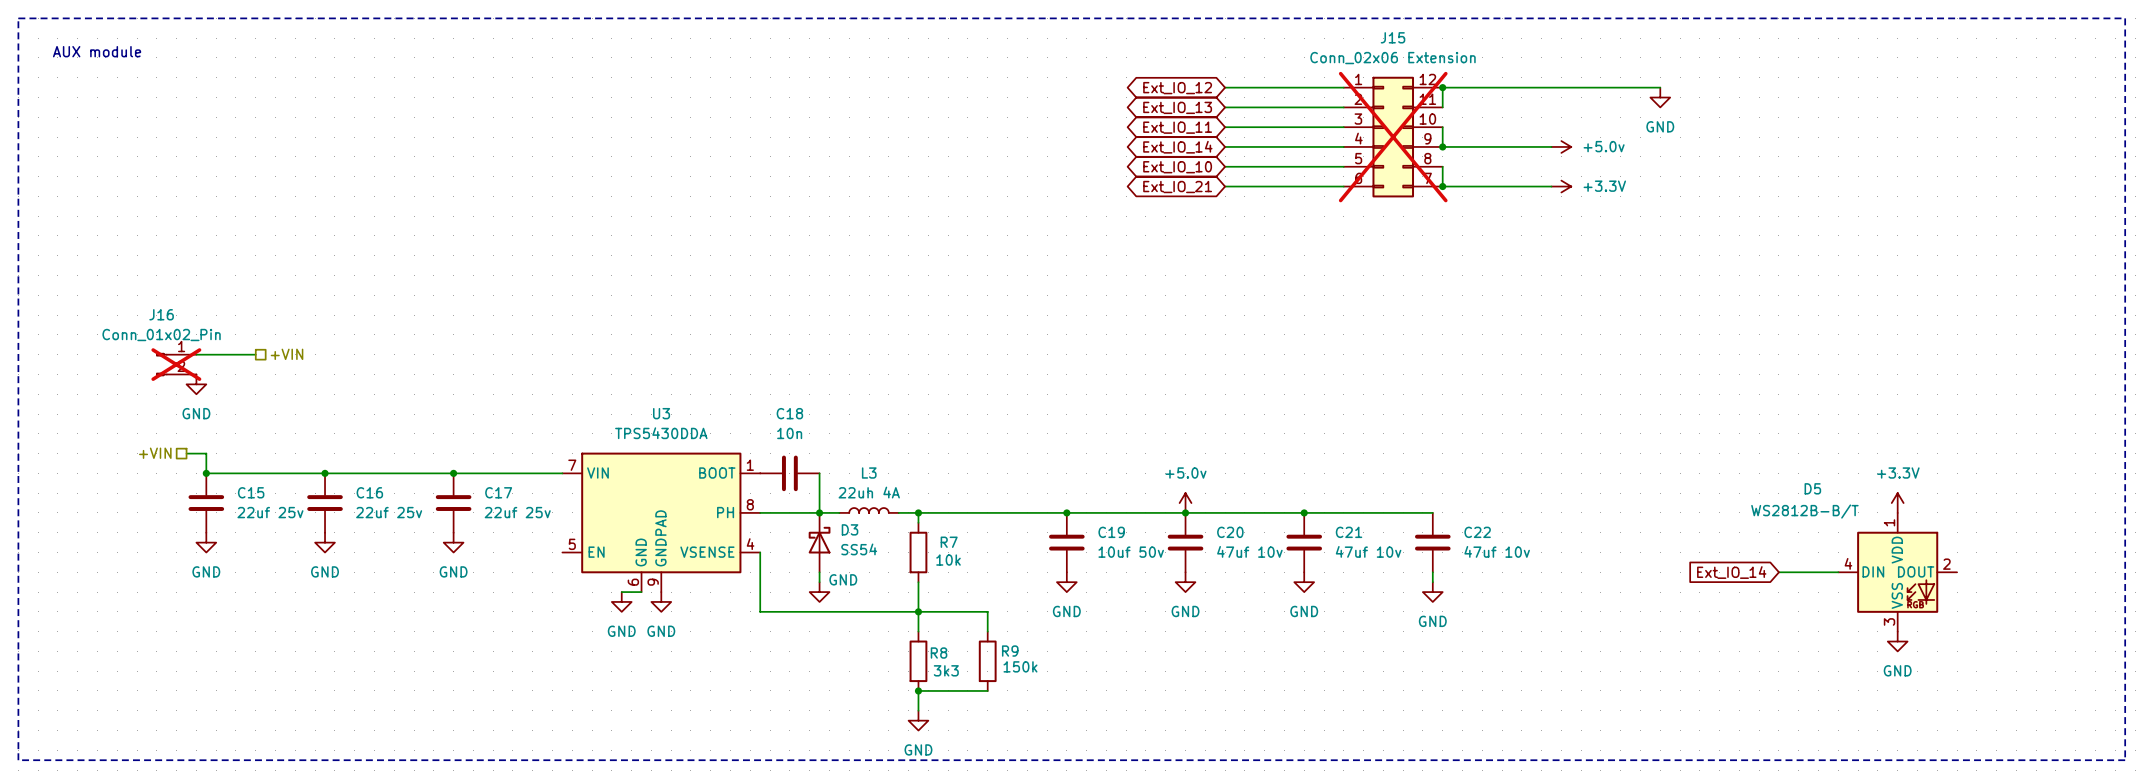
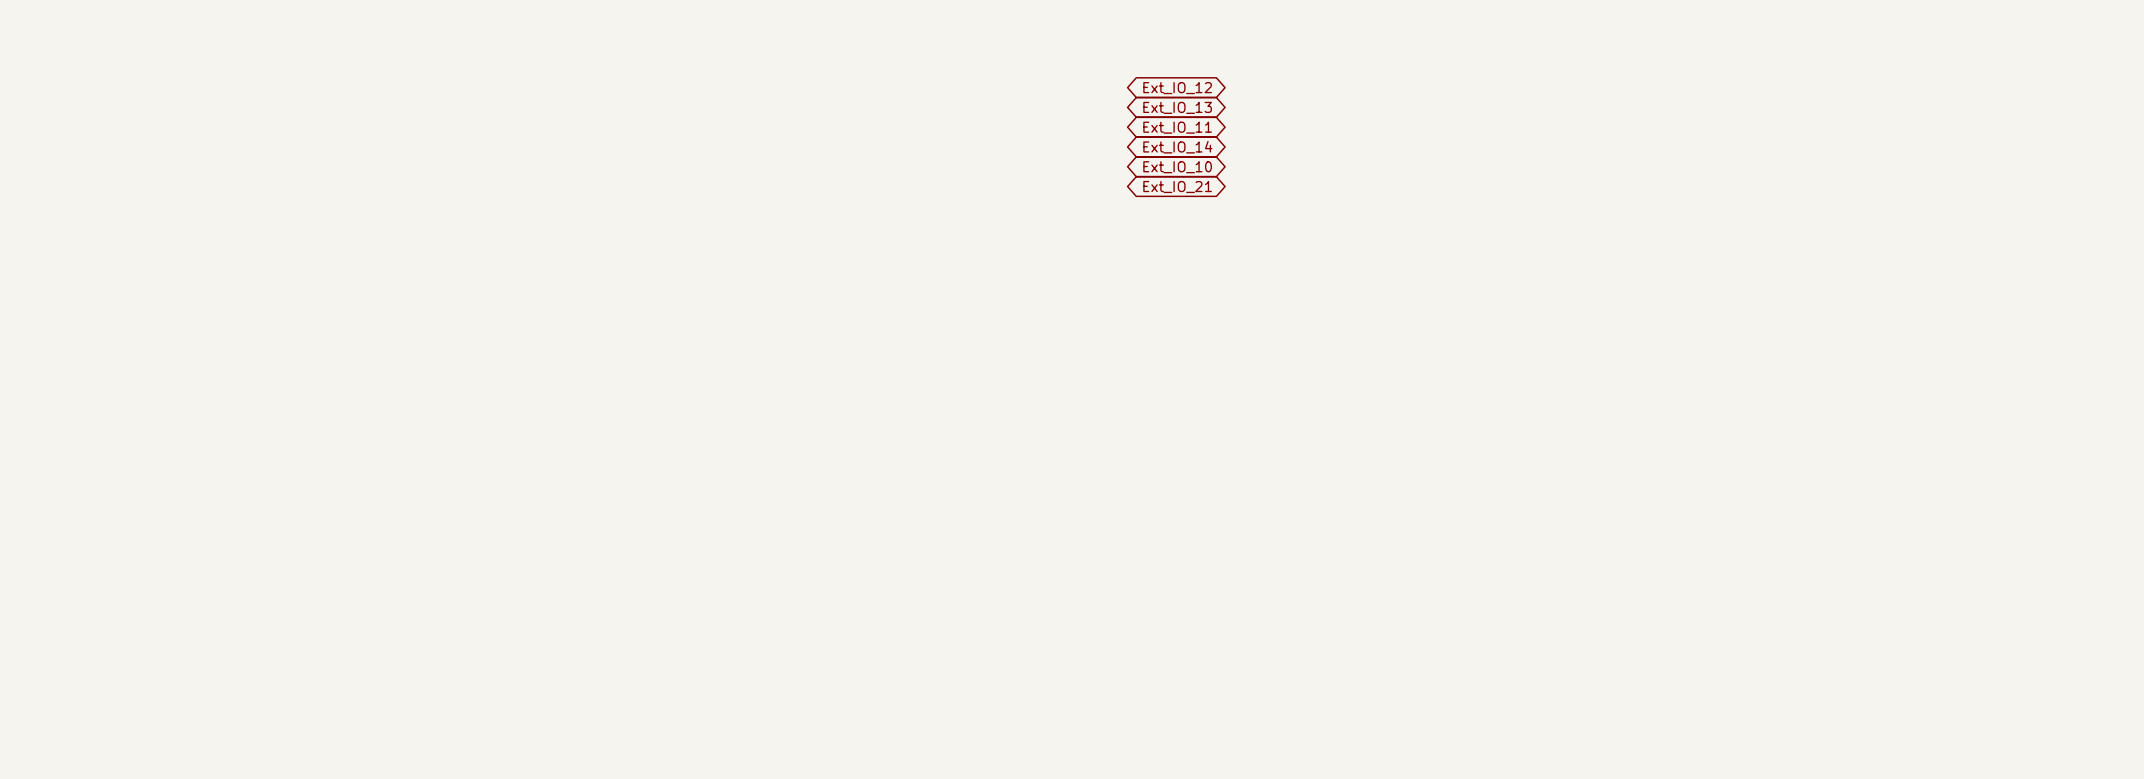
line: (18, 18) (2125, 18) (2125, 760) (18, 760) (18, 18) -> none
text: AUX module (97, 51) -> none
wire: (1225, 87) (1343, 87) -> none
junction: (1442, 87) -> none
wire: (1660, 87) (1442, 87) (1442, 107) -> none
power symbol: GND (1660, 97) -> none
wire: (1225, 107) (1343, 107) -> none
wire: (1225, 127) (1343, 127) -> none
wire: (1442, 127) (1442, 146) (1551, 146) -> none
J15: Conn_02x06 Extension (1393, 137) -> none
wire: (1225, 146) (1343, 146) -> none
junction: (1442, 146) -> none
power symbol: +5.0v (1561, 146) -> none
wire: (1225, 166) (1343, 166) -> none
wire: (1442, 166) (1442, 186) (1551, 186) -> none
wire: (1225, 186) (1343, 186) -> none
junction: (1442, 186) -> none
power symbol: +3.3V (1561, 186) -> none
wire: (196, 354) (255, 354) -> none
hierarchical label: +VIN (287, 354) -> none
J16: Conn_01x02_Pin (176, 364) -> none
power symbol: GND (196, 384) -> none
hierarchical label: +VIN (155, 453) -> none
wire: (186, 453) (206, 453) (206, 473) (562, 473) -> none
junction: (206, 473) -> none
junction: (325, 473) -> none
junction: (453, 473) -> none
C18: 10n (789, 473) -> none
wire: (819, 473) (819, 512) -> none
C15: 22uf 25v (206, 503) -> none
C16: 22uf 25v (325, 503) -> none
C17: 22uf 25v (453, 503) -> none
power symbol: +5.0v (1185, 503) -> none
power symbol: +3.3V (1897, 503) -> none
L3: 22uh 4A (869, 510) -> none
wire: (760, 512) (839, 512) -> none
junction: (819, 512) -> none
wire: (898, 512) (1432, 512) -> none
wire: (918, 512) (918, 522) -> none
junction: (918, 512) -> none
junction: (1066, 512) -> none
junction: (1185, 512) -> none
junction: (1304, 512) -> none
U3: TPS5430DDA (661, 522) -> none
power symbol: GND (206, 542) -> none
power symbol: GND (325, 542) -> none
power symbol: GND (453, 542) -> none
D3: SS54 (819, 542) -> none
C19: 10uf 50v (1066, 542) -> none
C20: 47uf 10v (1185, 542) -> none
C21: 47uf 10v (1304, 542) -> none
C22: 47uf 10v (1432, 542) -> none
wire: (760, 552) (760, 611) (987, 611) (987, 631) -> none
R7: 10k (918, 552) -> none
wire: (819, 572) (819, 582) -> none
wire: (1432, 572) (1432, 582) -> none
global label: Ext_IO_14 (1731, 572) -> none
wire: (1778, 572) (1838, 572) -> none
D5: WS2812B-B/T (1897, 572) -> none
wire: (918, 582) (918, 631) -> none
power symbol: GND (1066, 582) -> none
power symbol: GND (1185, 582) -> none
power symbol: GND (1304, 582) -> none
wire: (621, 592) (641, 592) -> none
power symbol: GND (819, 592) -> none
power symbol: GND (1432, 592) -> none
power symbol: GND (621, 601) -> none
power symbol: GND (661, 601) -> none
junction: (918, 611) -> none
power symbol: GND (1897, 641) -> none
R8: 3k3 (918, 661) -> none
R9: 150k (987, 661) -> none
junction: (918, 690) -> none
wire: (987, 690) (918, 690) (918, 710) -> none
power symbol: GND (918, 720) -> none

